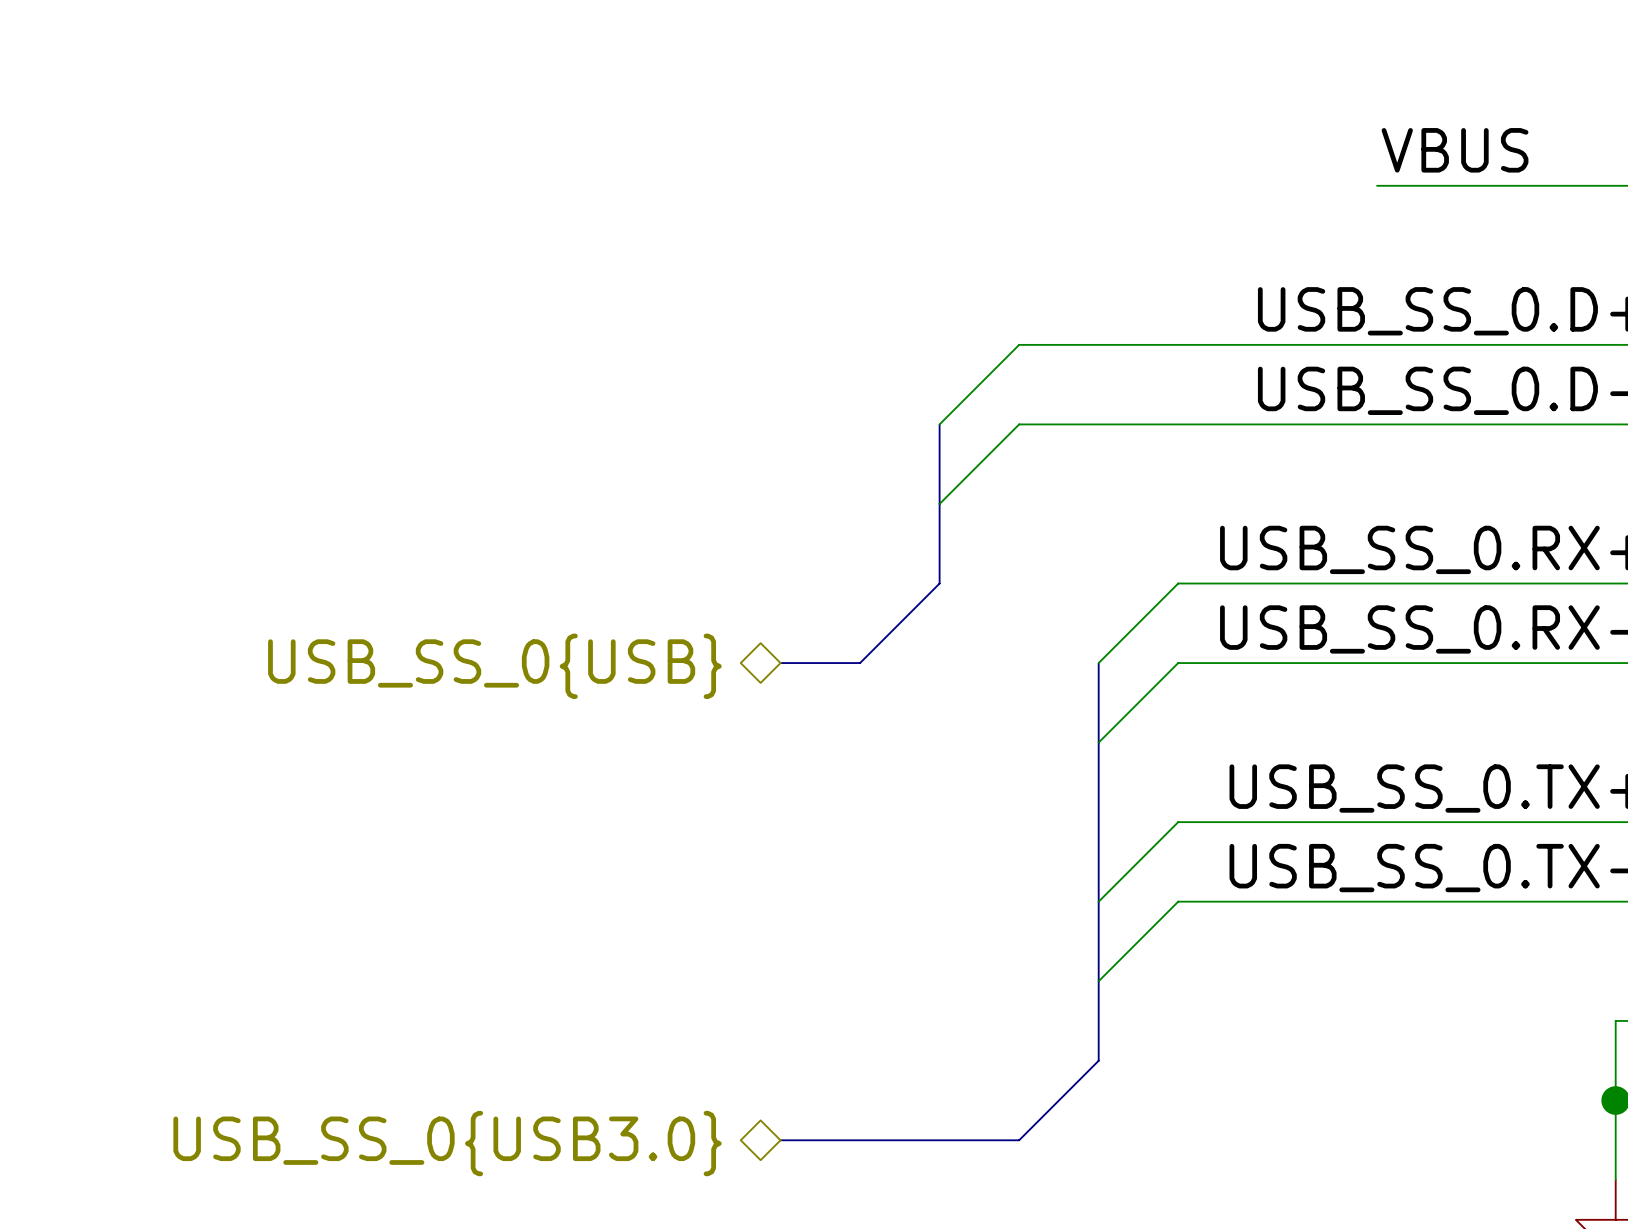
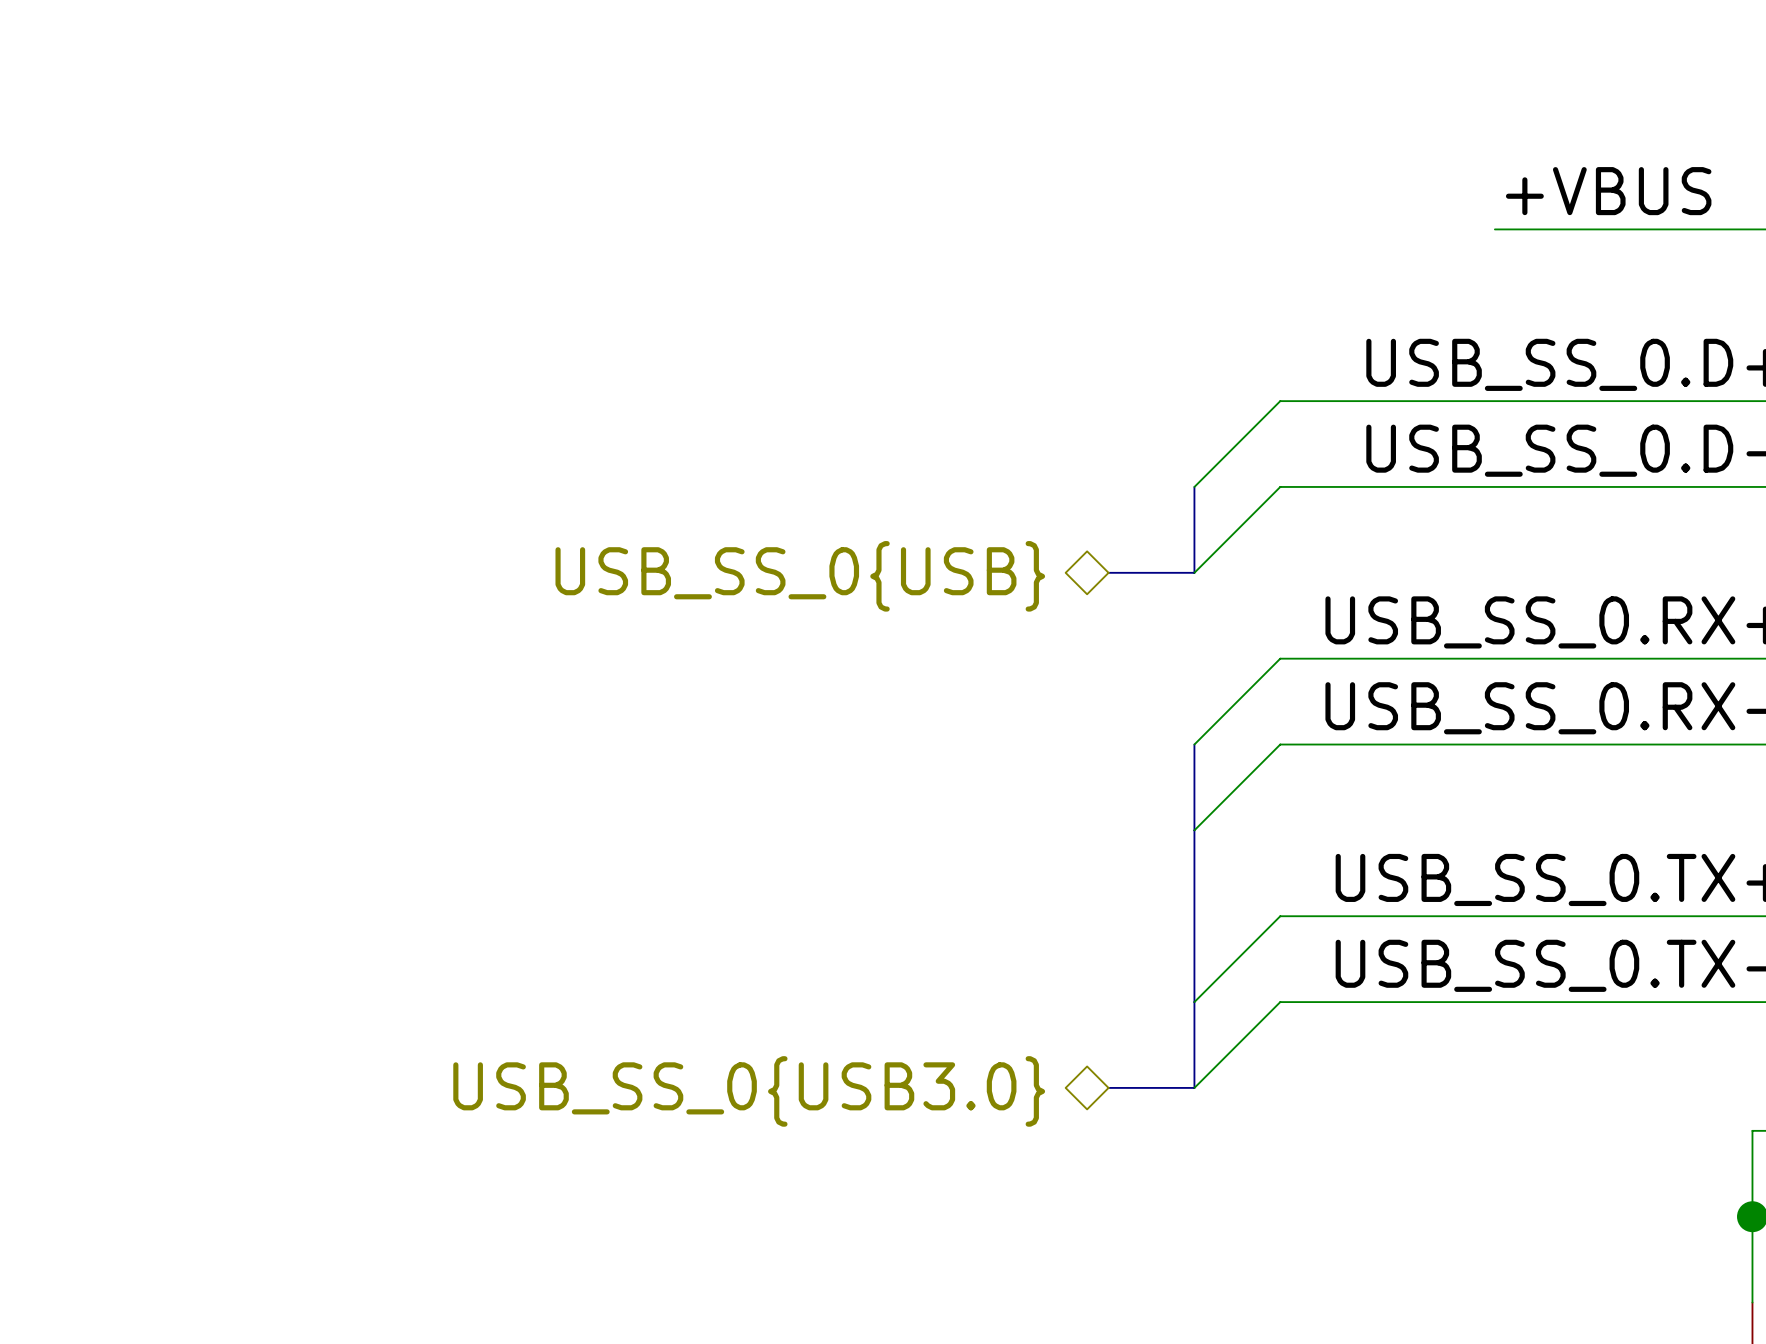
label: VBUS (1455, 150) -> +VBUS (1608, 191)
wire: (1178, 344) (1019, 344) (939, 424) -> (1280, 401) (1194, 486)
bus: (939, 424) (939, 583) (860, 663) (780, 663) -> none
bus: none -> (1194, 486) (1194, 572) (1108, 572)
wire: (1178, 424) (1019, 424) (939, 503) -> (1280, 486) (1194, 572)
hierarchical label position: USB_SS_0{USB} (494, 666) -> USB_SS_0{USB} (800, 576)
bus: (1098, 981) (1098, 1060) (1019, 1140) (780, 1140) -> (1194, 1087) (1108, 1087)
hierarchical label position: USB_SS_0{USB3.0} (447, 1143) -> USB_SS_0{USB3.0} (749, 1091)

